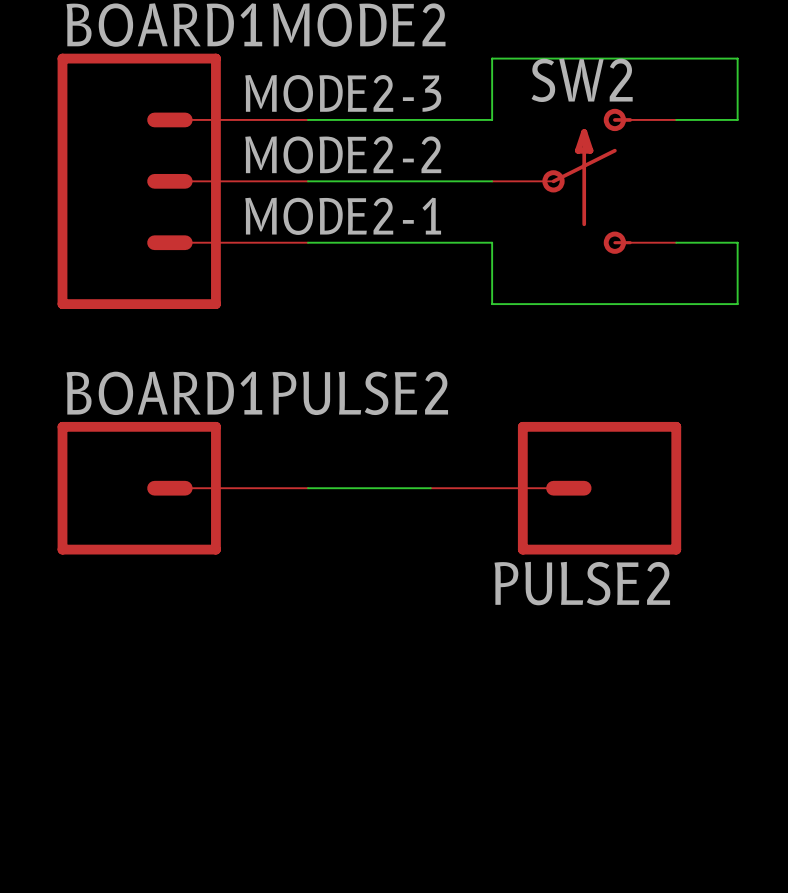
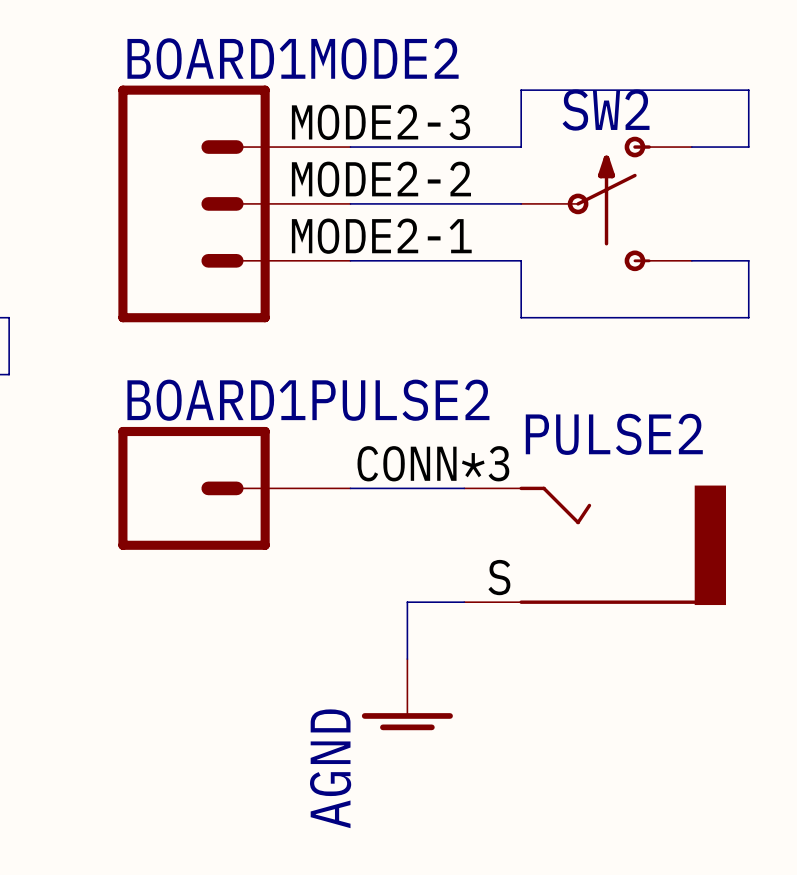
PULSE2 symbol: [430, 421, 682, 555] -> [464, 485, 726, 606]
PULSE2 name position: PULSE2 (582, 583) -> PULSE2 (614, 434)
wire: none -> (464, 602) (407, 602) (407, 659)
power symbol: none -> AGND (407, 694)

